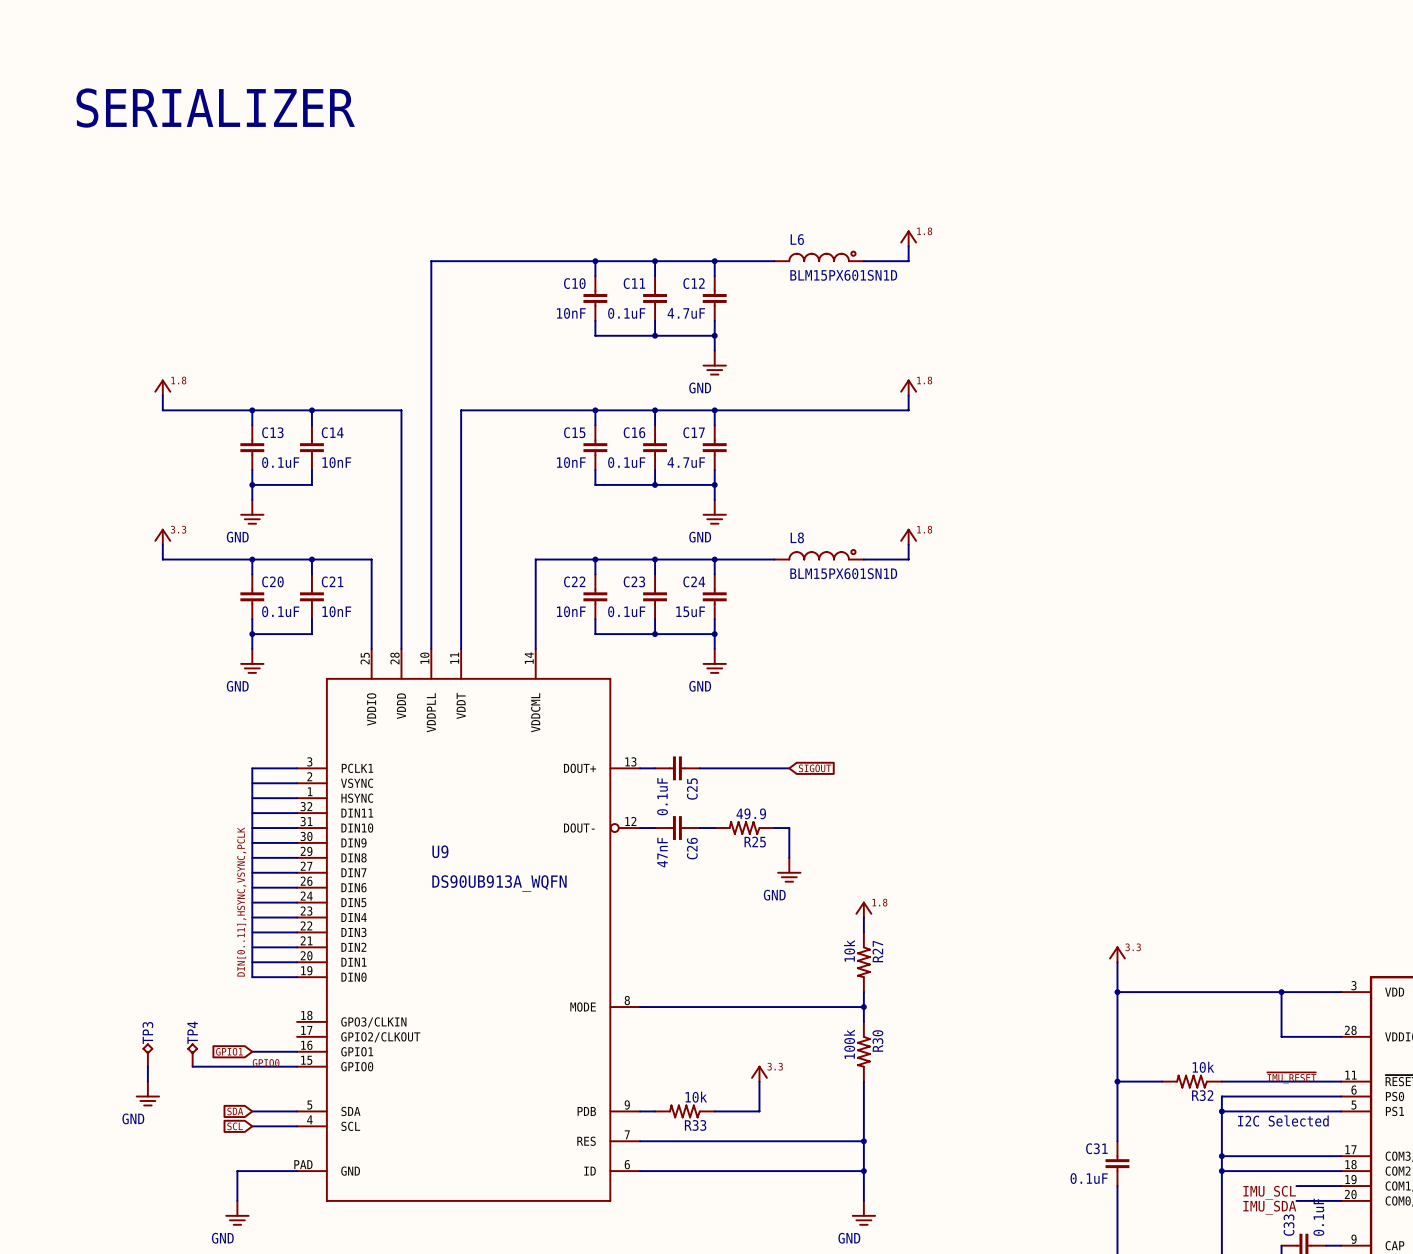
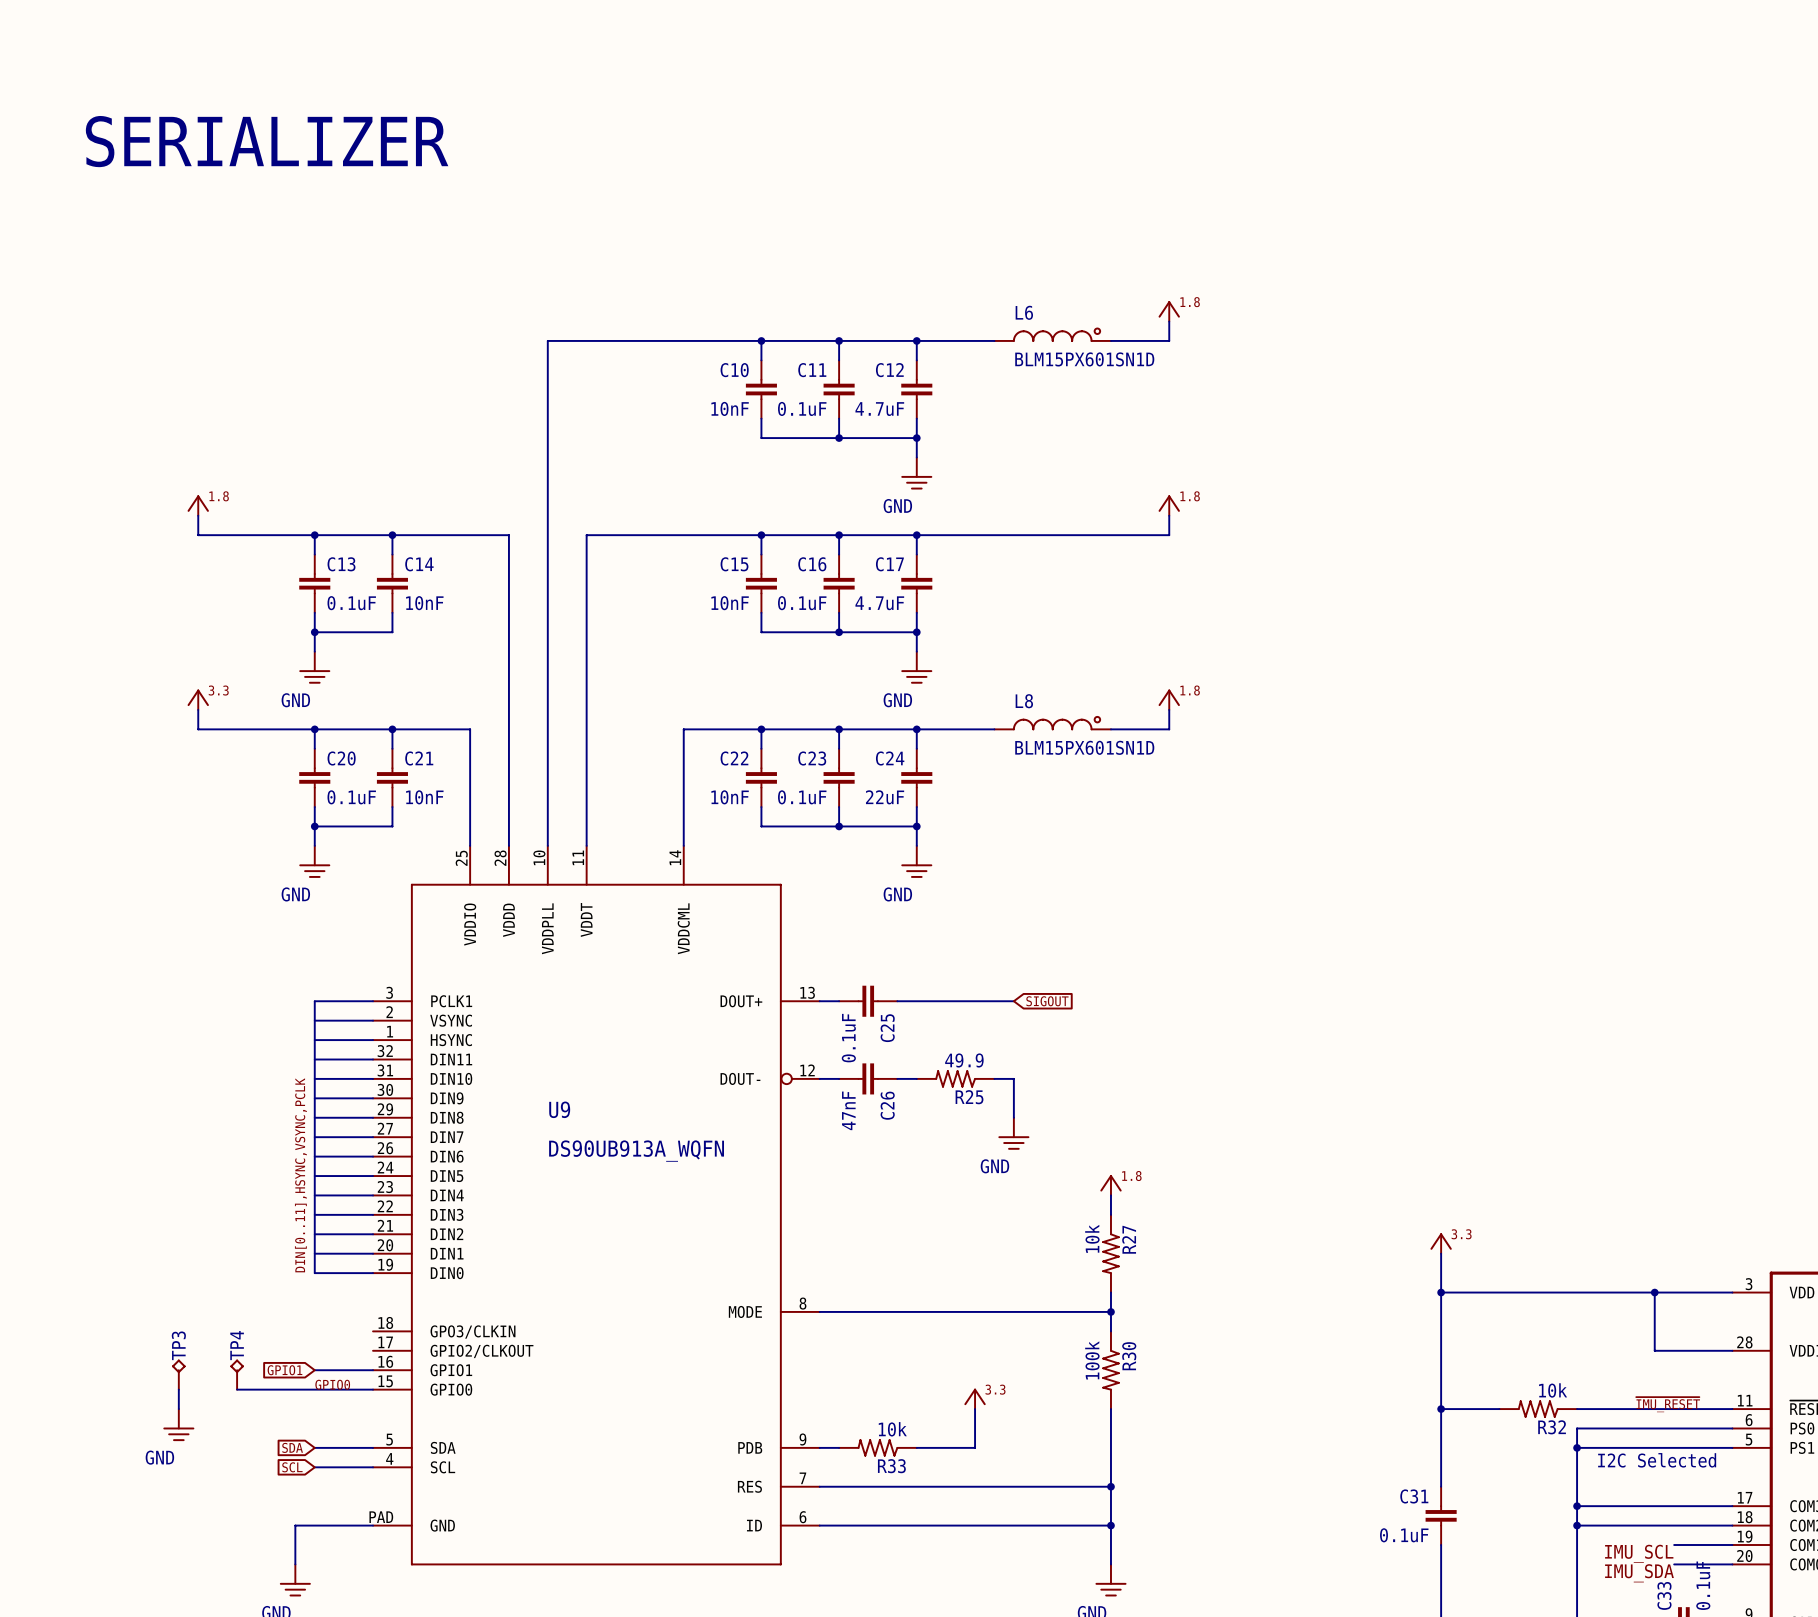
C24 value: 15uF (690, 611) -> 22uF (885, 797)

